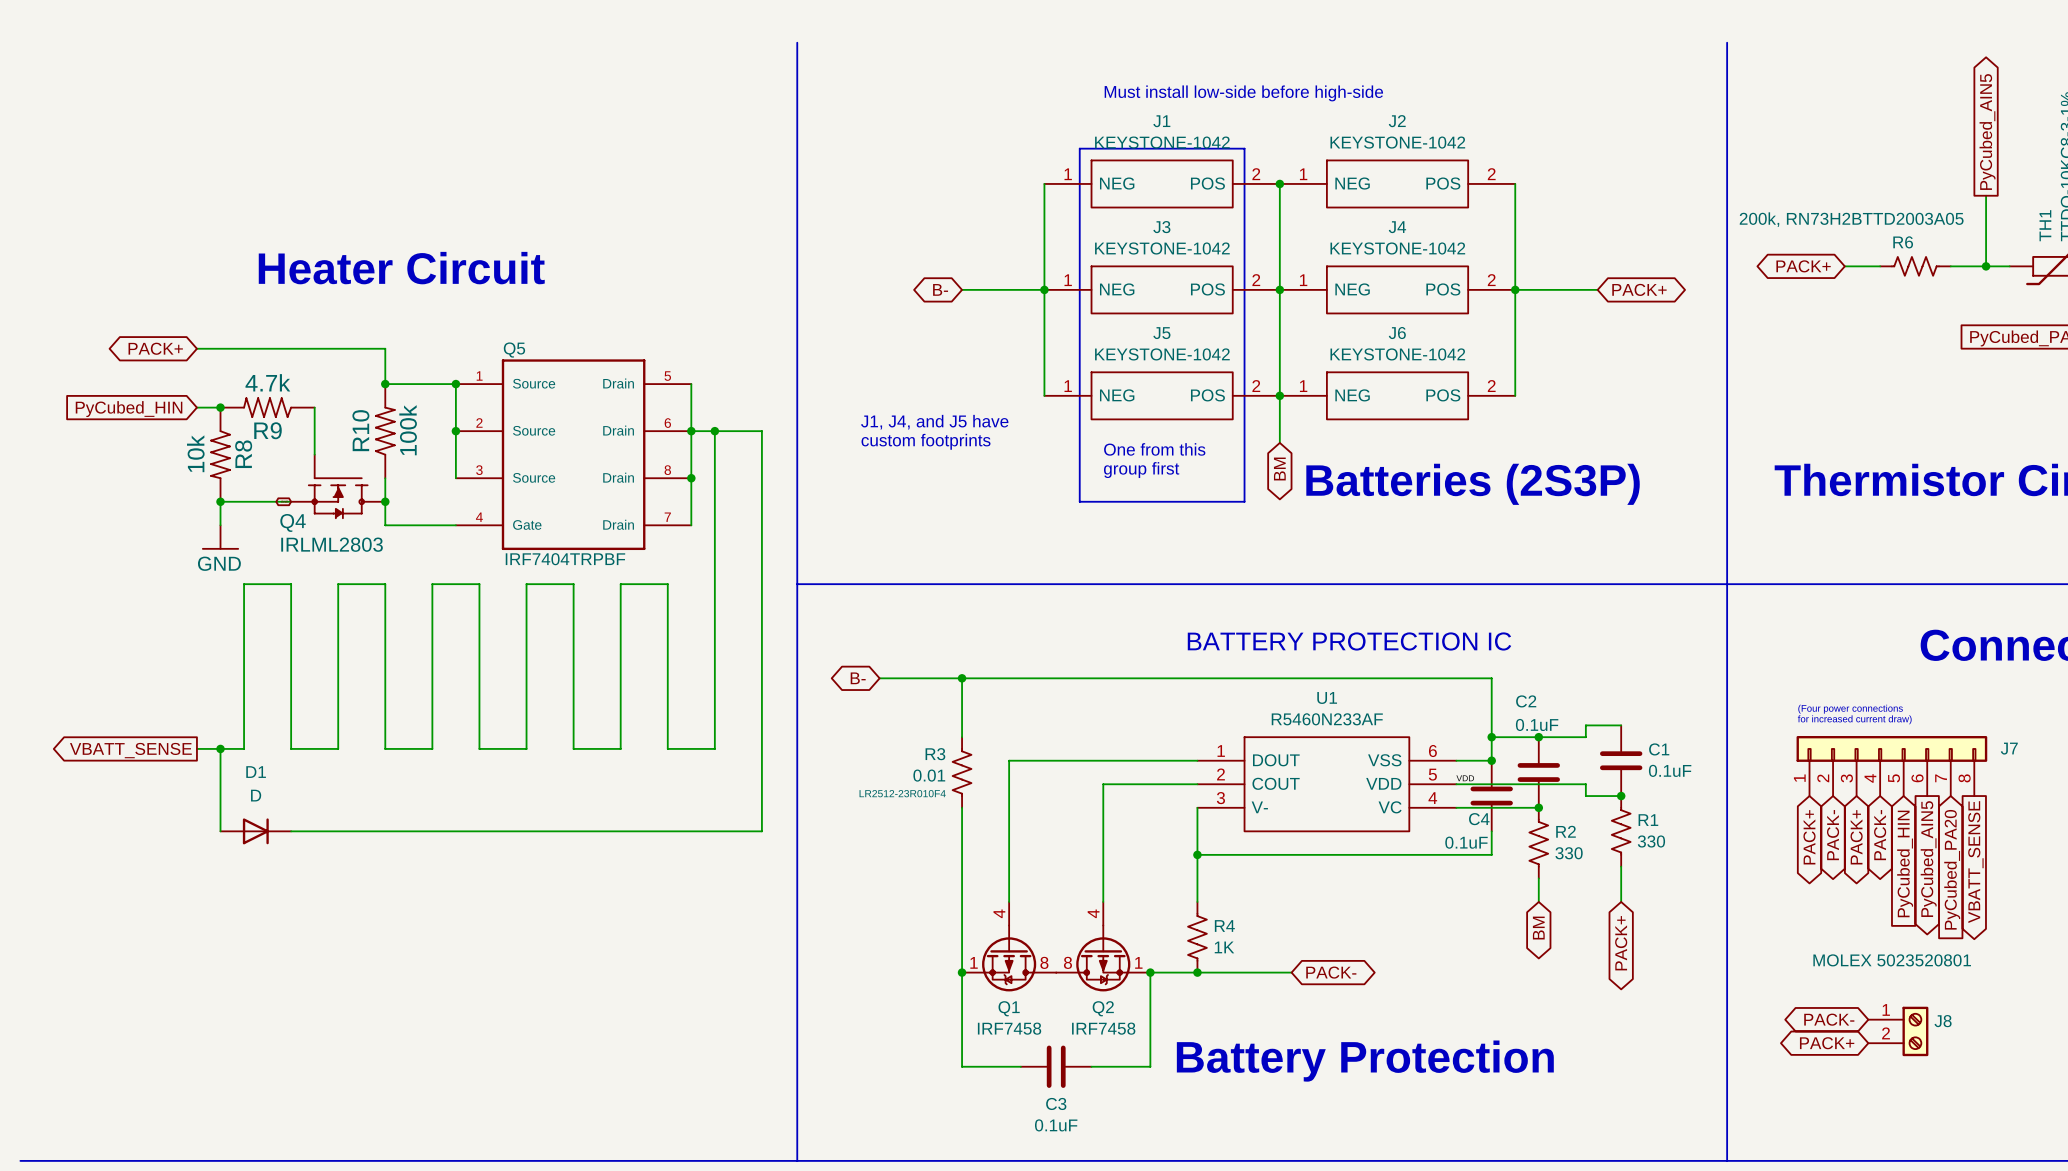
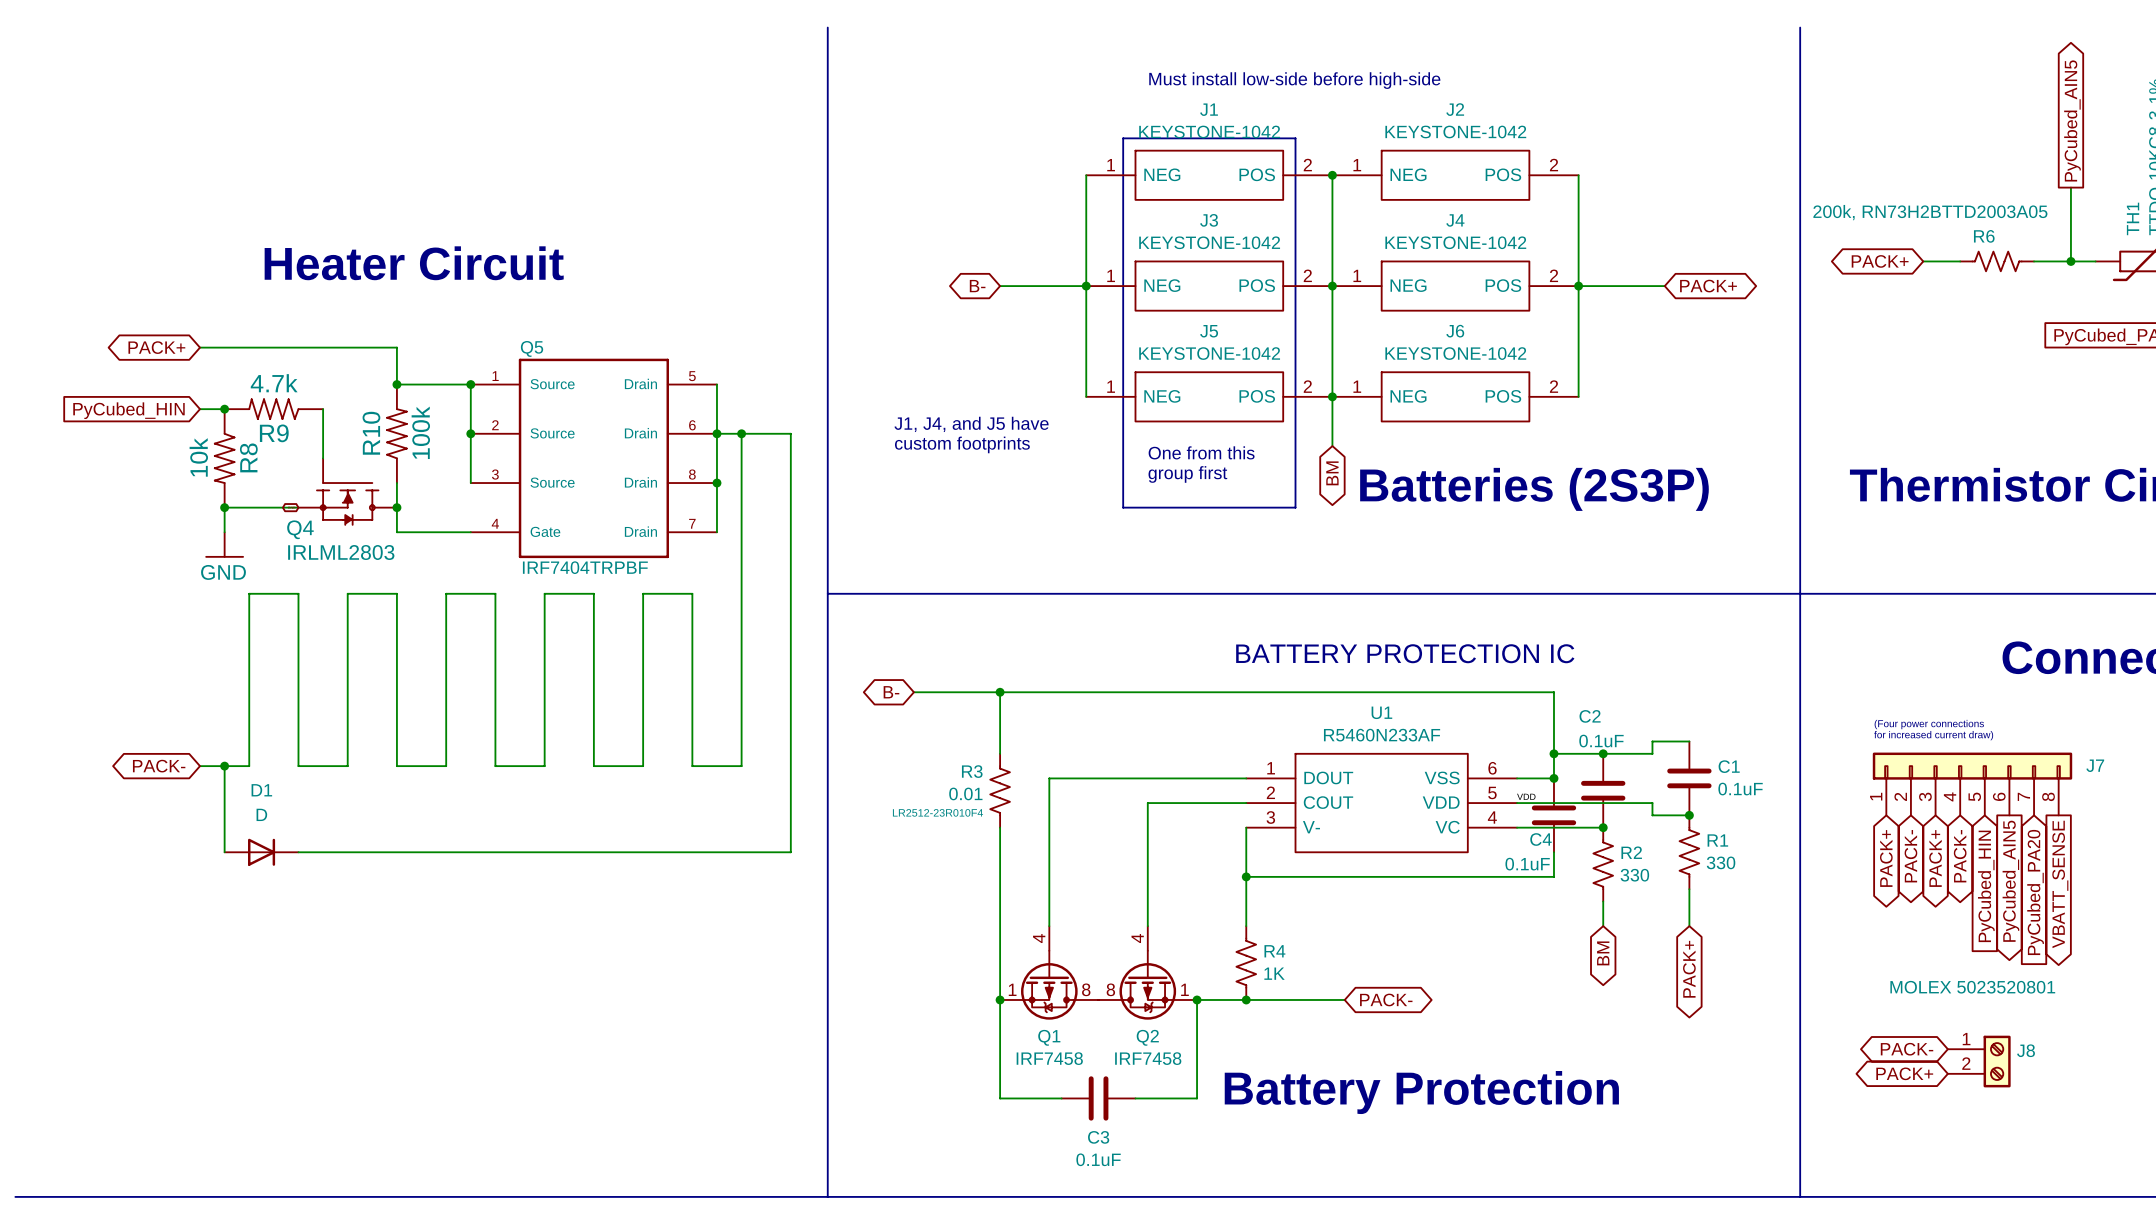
global label shape: output (130, 750) -> bidirectional (159, 766)
global label: VBATT_SENSE (130, 750) -> PACK- (159, 766)

